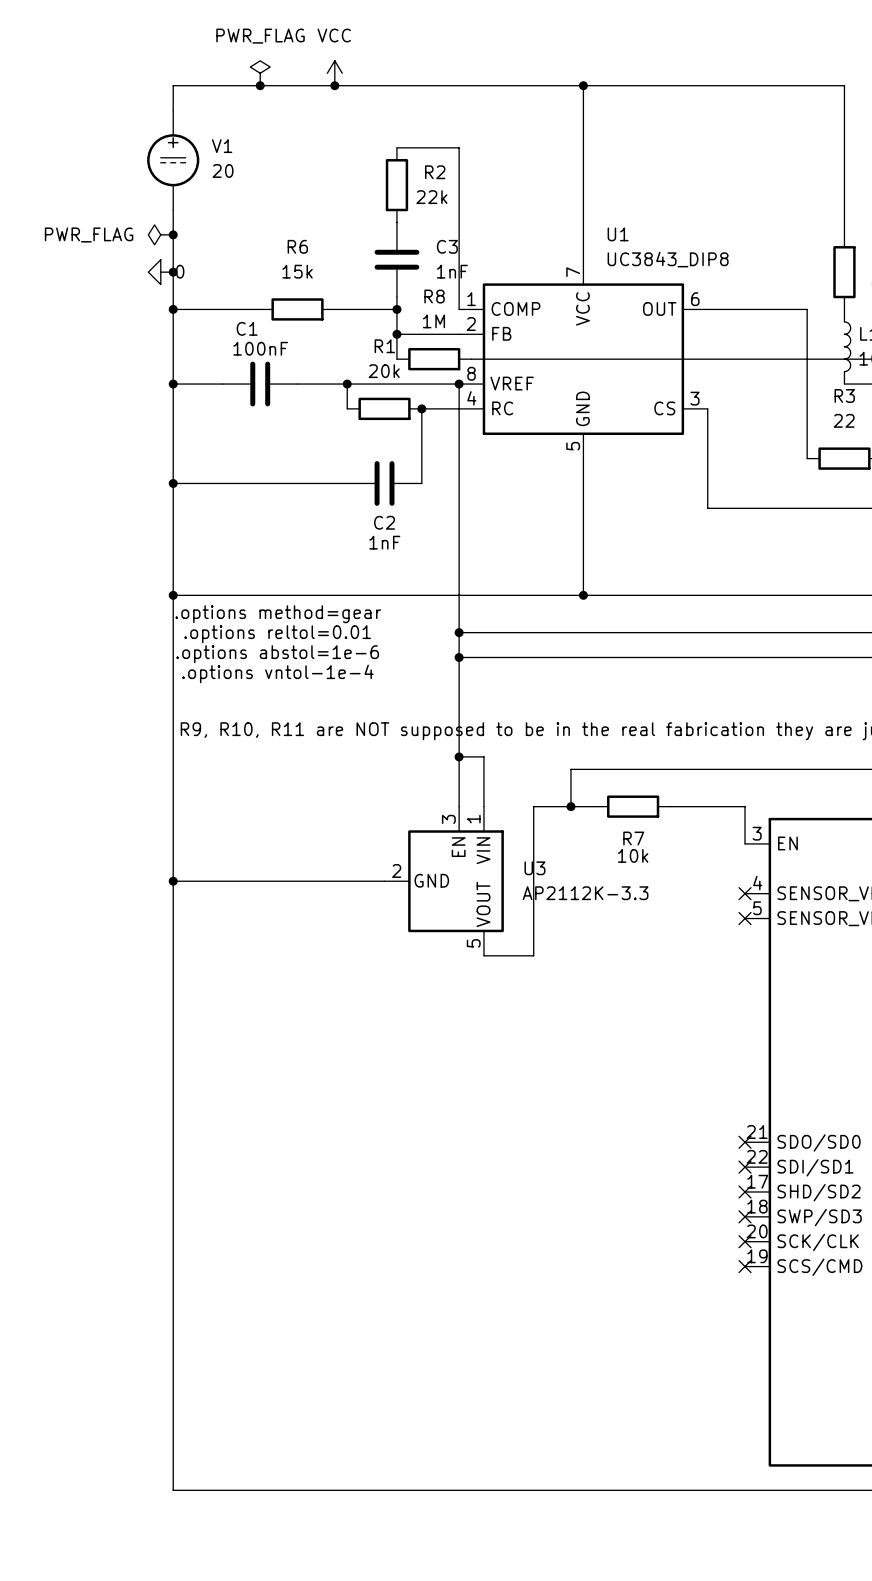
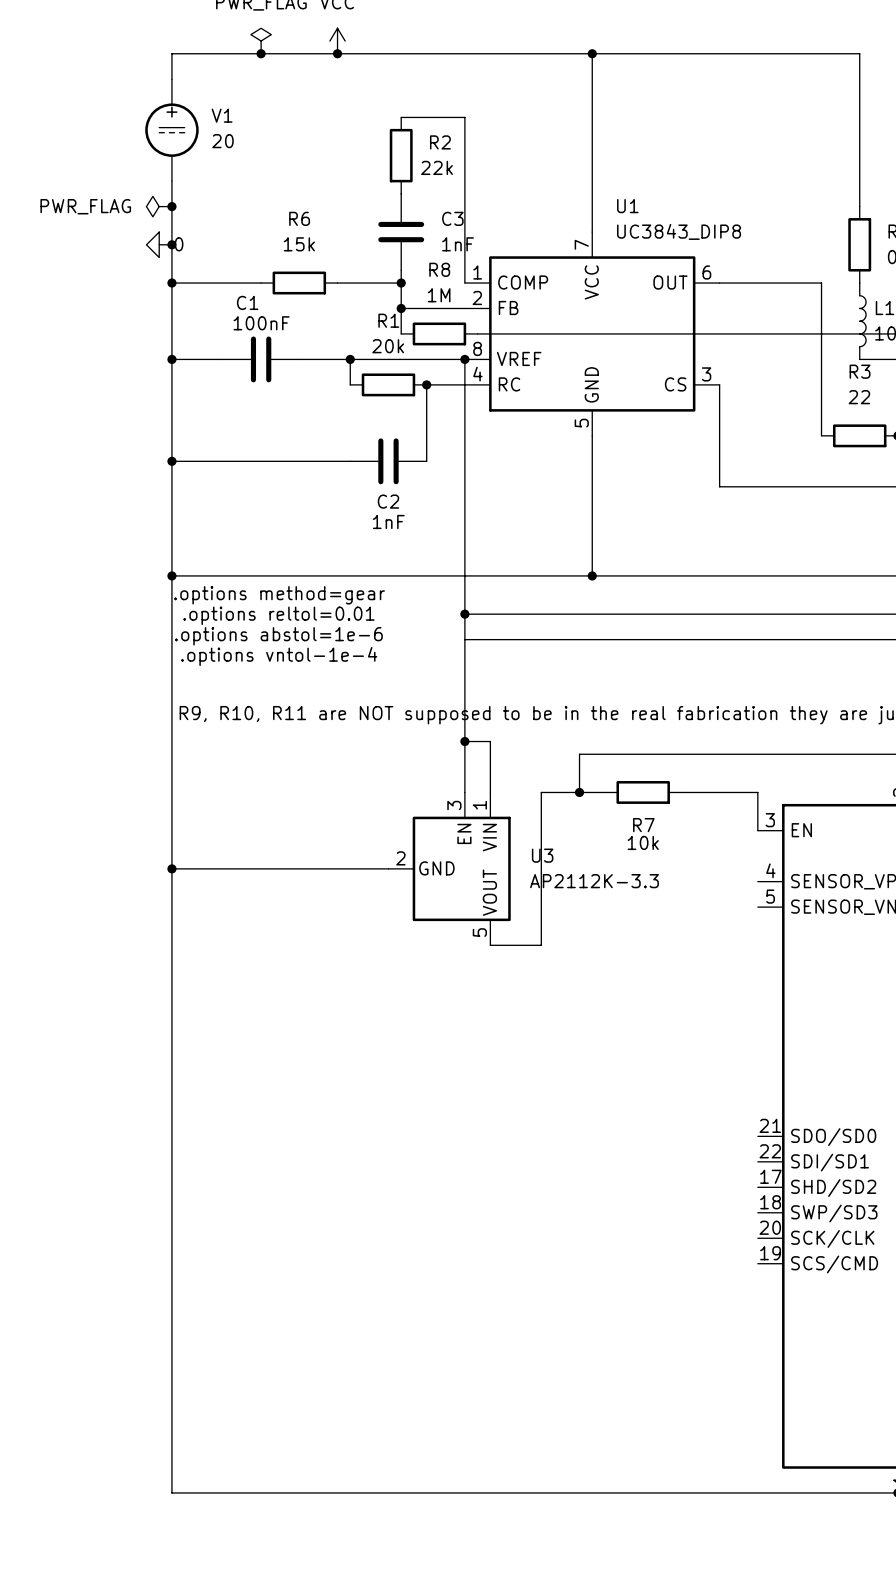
junction: (459, 657) -> none
no-connect mark: (745, 893) -> none
no-connect mark: (745, 918) -> none
no-connect mark: (745, 1142) -> none
no-connect mark: (745, 1167) -> none
no-connect mark: (745, 1191) -> none
no-connect mark: (745, 1216) -> none
no-connect mark: (745, 1241) -> none
no-connect mark: (745, 1266) -> none

